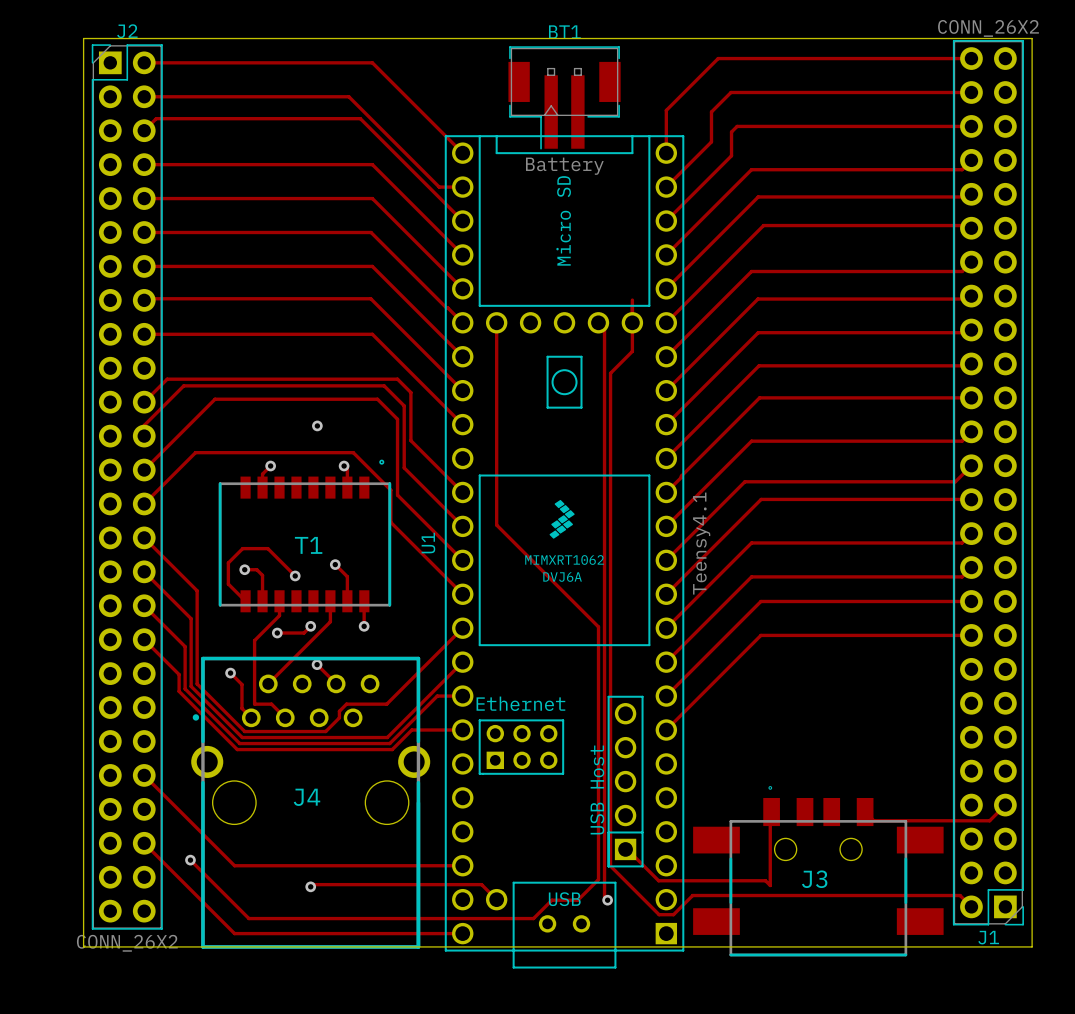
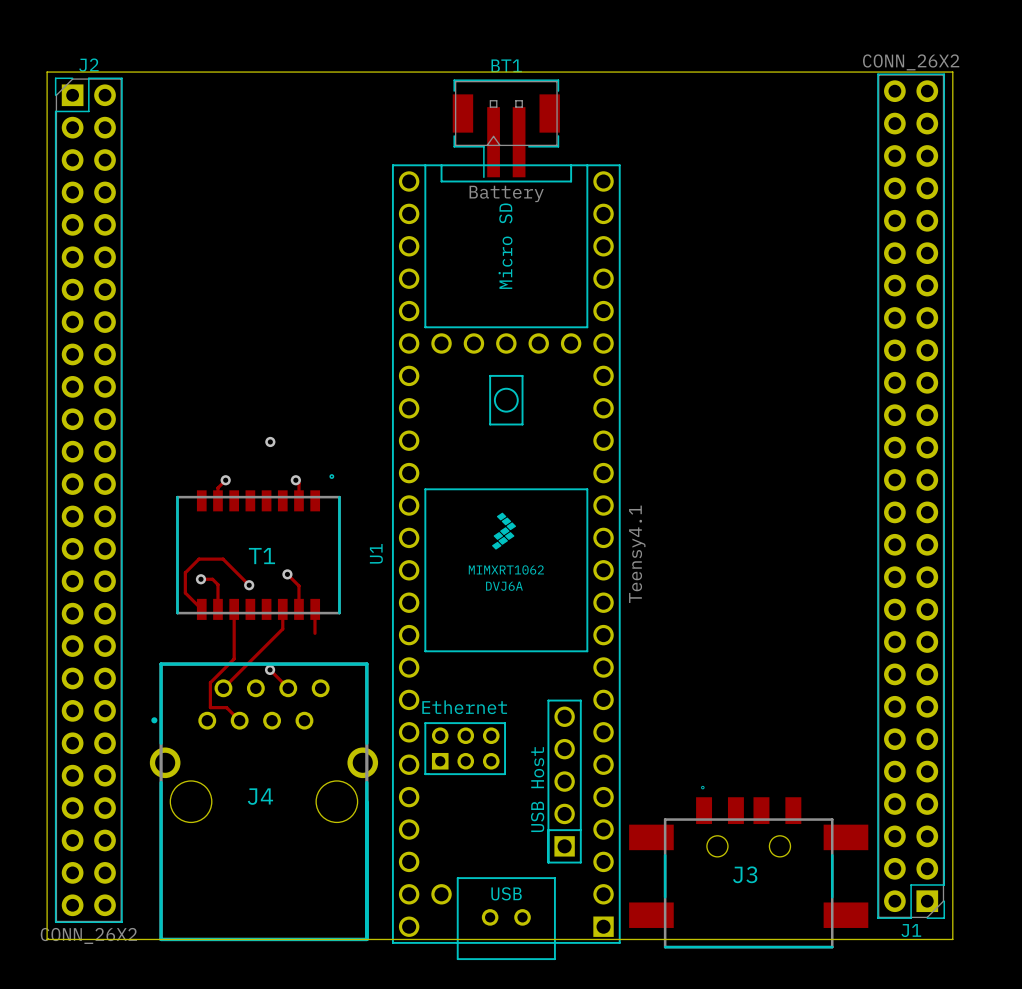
track: (971, 58) (718, 58) (666, 110) (666, 153) -> none
track: (144, 62) (372, 62) (462, 153) -> none
track: (971, 92) (730, 92) (711, 112) (711, 141) (666, 187) -> none
track: (144, 96) (348, 96) (439, 187) (462, 187) -> none
track: (971, 126) (737, 126) (731, 132) (731, 155) (666, 221) -> none
track: (144, 130) (156, 118) (360, 118) (462, 221) -> none
track: (971, 160) (962, 169) (751, 169) (666, 254) -> none
track: (144, 164) (372, 164) (462, 254) -> none
track: (971, 194) (968, 196) (758, 196) (666, 288) -> none
track: (144, 198) (372, 198) (462, 288) -> none
track: (971, 228) (968, 225) (763, 225) (666, 322) -> none
track: (144, 232) (371, 232) (462, 322) -> none
track: (971, 262) (962, 271) (751, 271) (666, 356) -> none
track: (144, 266) (372, 266) (462, 356) -> none
track: (971, 296) (968, 299) (757, 299) (666, 390) -> none
track: (144, 300) (145, 298) (370, 298) (462, 390) -> none
track: (632, 300) (632, 351) (610, 373) (610, 866) (659, 914) (673, 914) (692, 895) (960, 895) (971, 906) -> none
track: (496, 322) (496, 525) (598, 626) (598, 879) (577, 900) (551, 900) (533, 918) (248, 918) (190, 860) -> none
track: (598, 322) (604, 328) (604, 897) (607, 900) -> none
track: (971, 330) (968, 332) (758, 332) (666, 424) -> none
track: (144, 334) (372, 334) (462, 424) -> none
track: (971, 363) (969, 365) (759, 365) (666, 458) -> none
track: (971, 397) (759, 397) (666, 492) -> none
track: (144, 402) (167, 379) (397, 379) (410, 392) (410, 440) (462, 492) -> none
track: (971, 431) (962, 441) (751, 441) (666, 526) -> none
track: (144, 436) (144, 425) (183, 385) (384, 385) (404, 405) (404, 467) (462, 526) -> none
track: (971, 465) (955, 481) (744, 481) (666, 560) -> none
track: (144, 470) (215, 399) (377, 399) (397, 419) (397, 495) (462, 560) -> none
track: (971, 499) (761, 499) (666, 594) -> none
track: (144, 503) (195, 452) (353, 452) (390, 490) (390, 522) (462, 594) -> none
track: (971, 533) (962, 542) (751, 542) (666, 628) -> none
track: (144, 537) (197, 590) (197, 683) (244, 731) (325, 731) (339, 717) (339, 711) (346, 704) (386, 704) (462, 628) -> none
track: (971, 567) (962, 576) (751, 576) (666, 662) -> none
track: (144, 571) (191, 618) (191, 686) (242, 737) (387, 737) (462, 662) -> none
track: (971, 601) (760, 601) (666, 696) -> none
track: (144, 605) (185, 646) (185, 688) (239, 743) (389, 743) (437, 696) (462, 696) -> none
track: (279, 615) (254, 640) (254, 678) -> (234, 623) (234, 658) (210, 682)
track: (310, 626) (304, 633) (277, 633) -> none
via: (310, 626) -> none
via: (364, 626) -> none
via: (277, 633) -> none
track: (971, 635) (760, 635) (666, 730) -> none
track: (144, 639) (179, 674) (179, 691) (237, 749) (392, 749) (411, 730) (462, 730) -> none
track: (230, 673) (241, 684) (241, 708) (251, 717) -> none
via: (230, 673) -> none
track: (144, 775) (234, 865) (462, 865) -> none
track: (1005, 805) (989, 820) (873, 820) (865, 812) -> none
track: (771, 812) (770, 885) (765, 880) (658, 880) (625, 849) -> none
track: (144, 843) (234, 933) (462, 933) -> none
via: (190, 860) -> none
track: (310, 886) (312, 884) (481, 884) (496, 899) -> none
via: (310, 886) -> none
via: (607, 900) -> none

